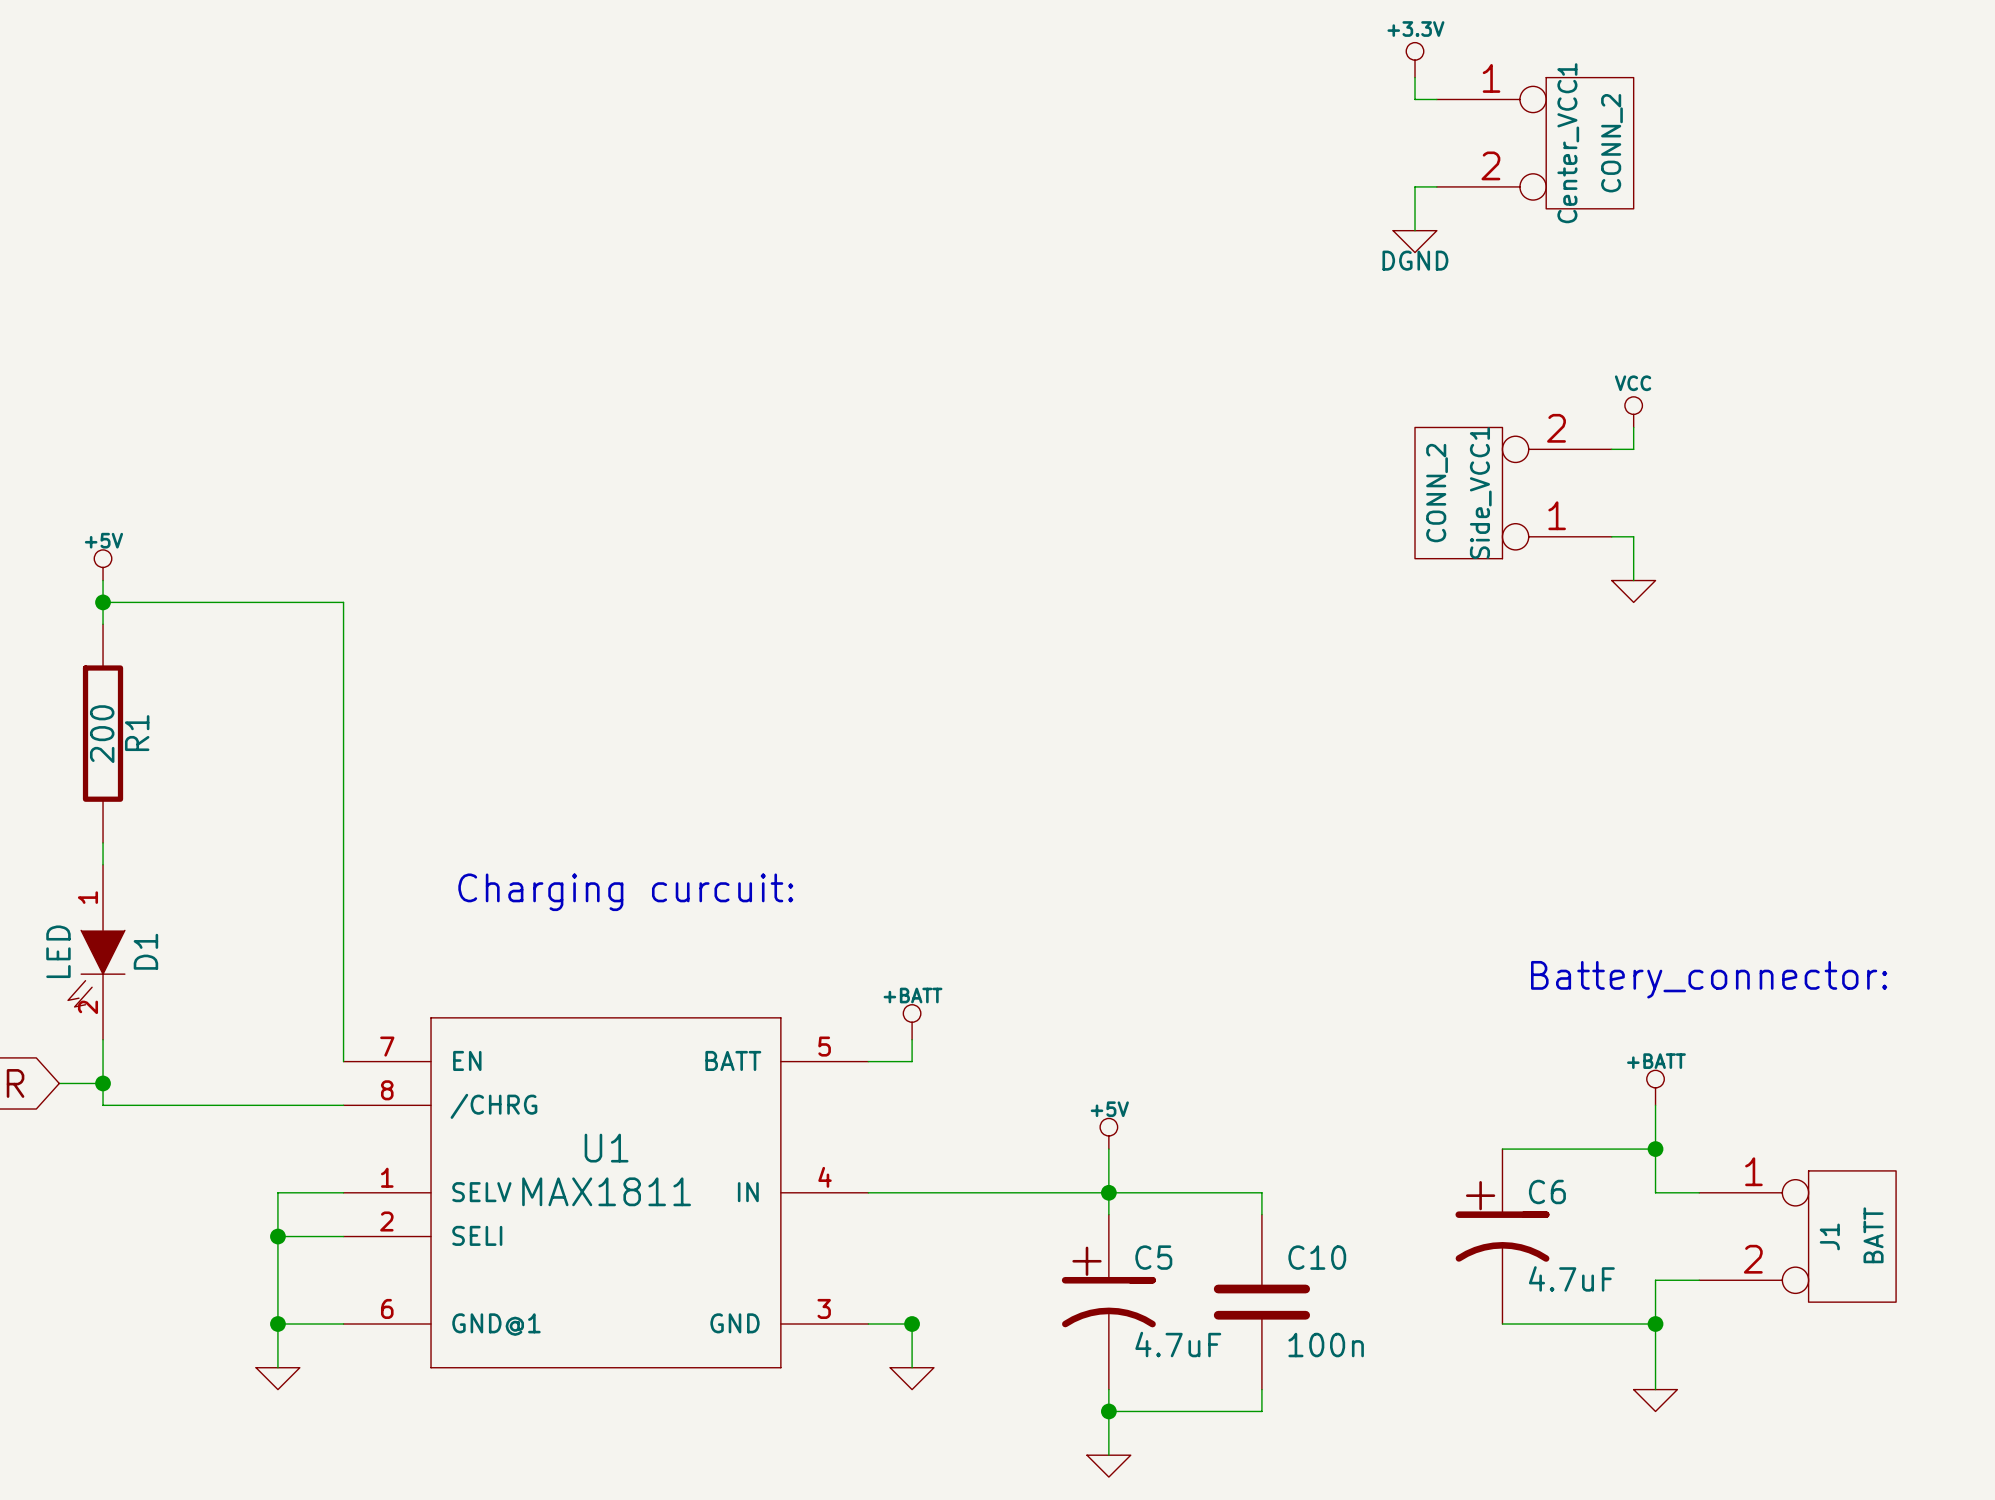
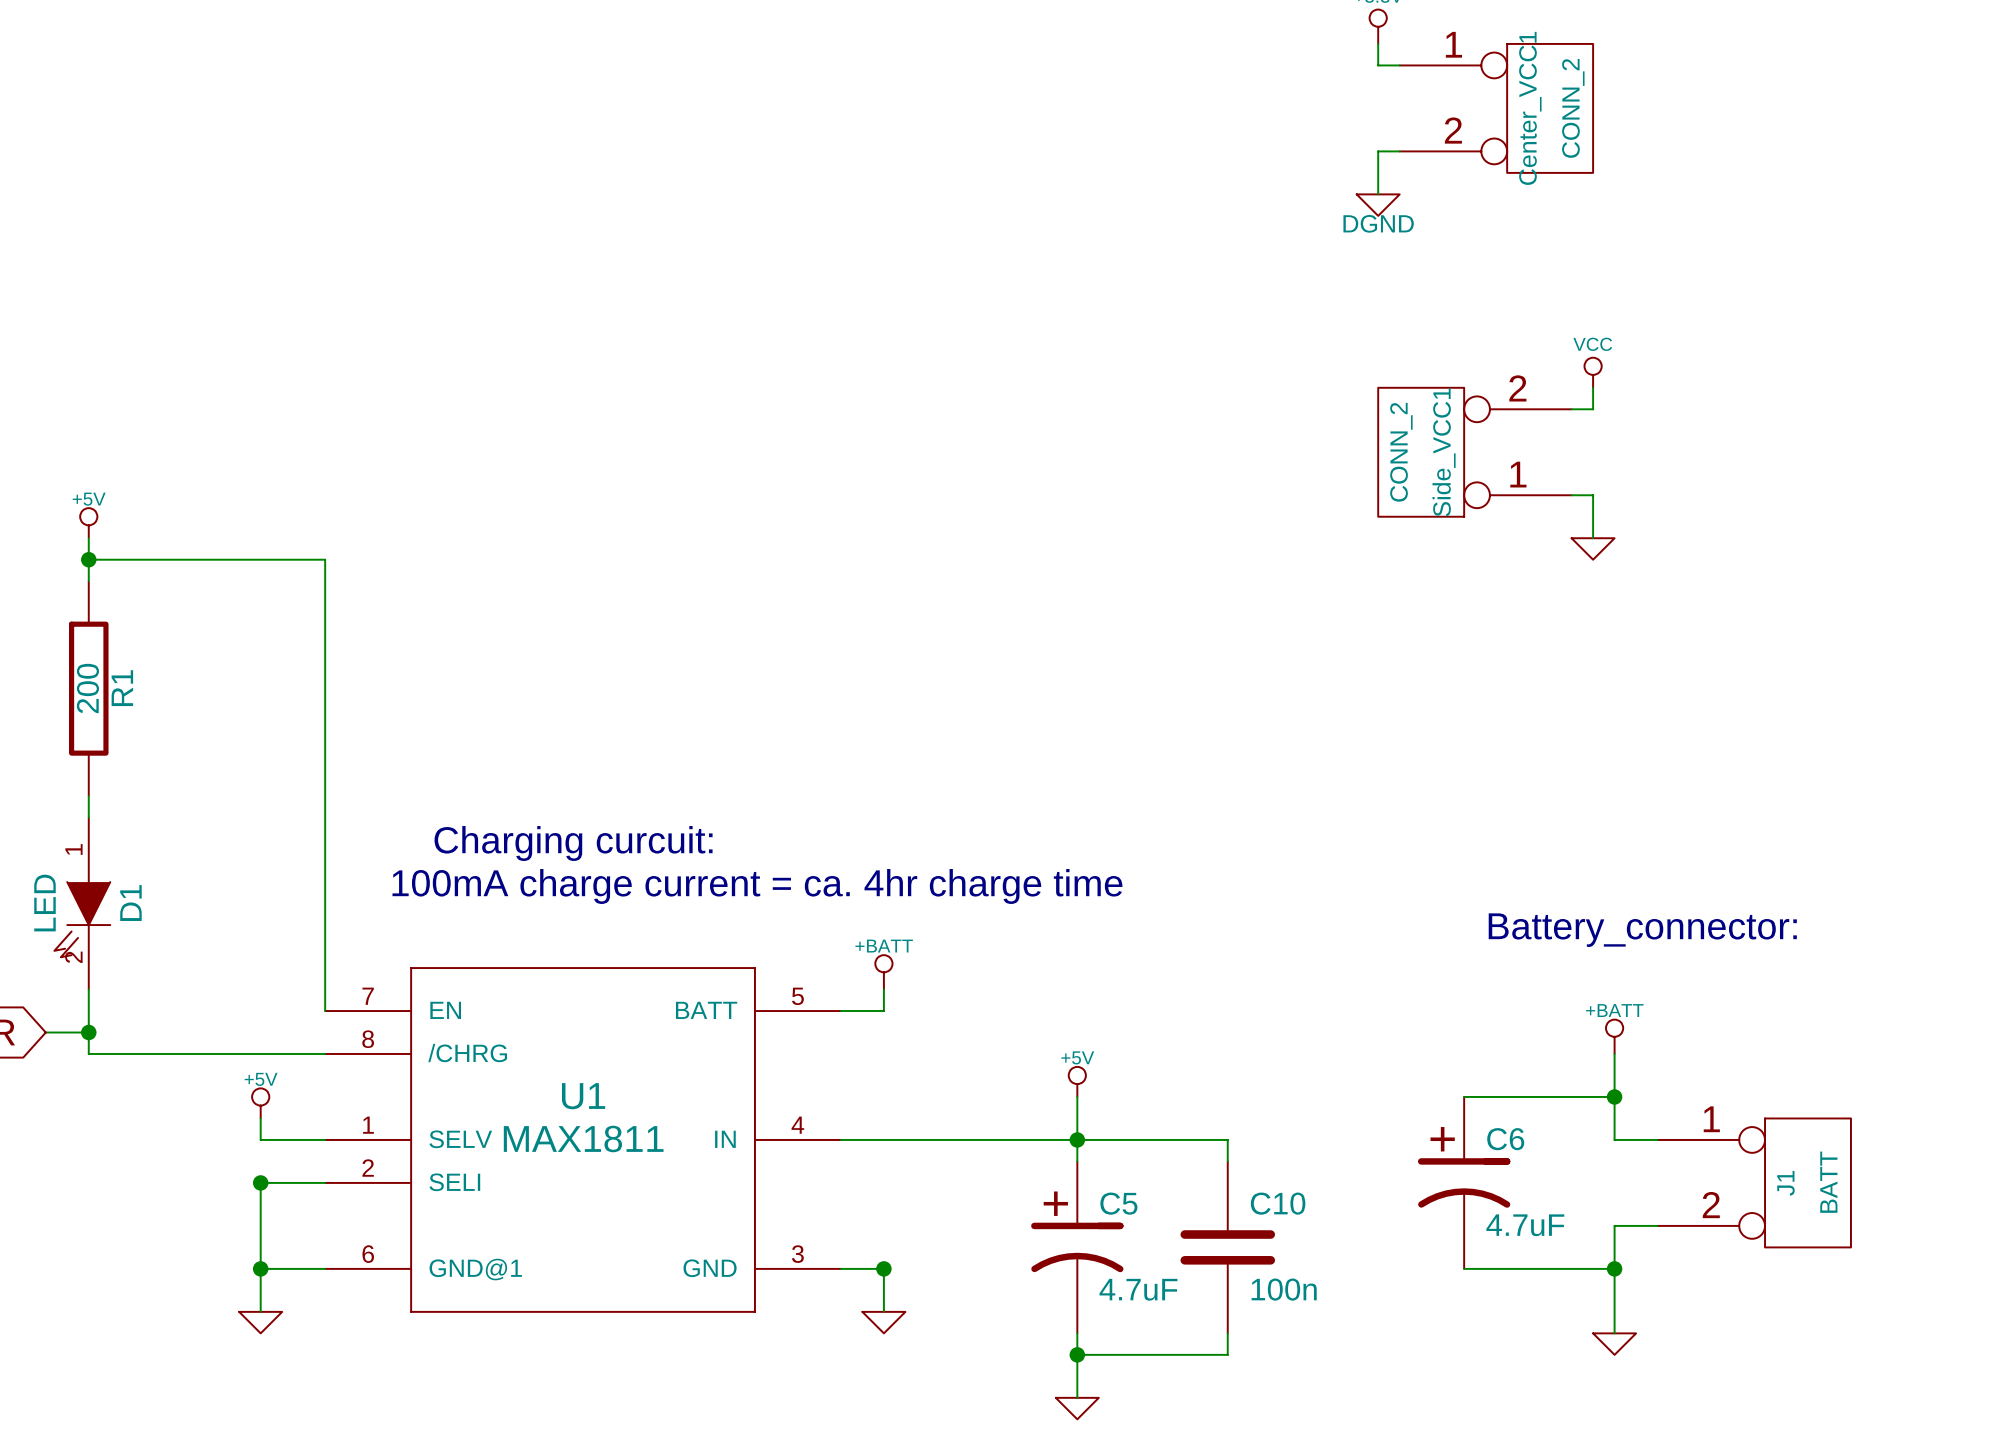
text: none -> 100mA charge current = ca. 4hr charge time (757, 886)
power symbol: none -> +5V (260, 1103)
wire: (277, 1192) (277, 1236) -> (260, 1139) (260, 1118)

